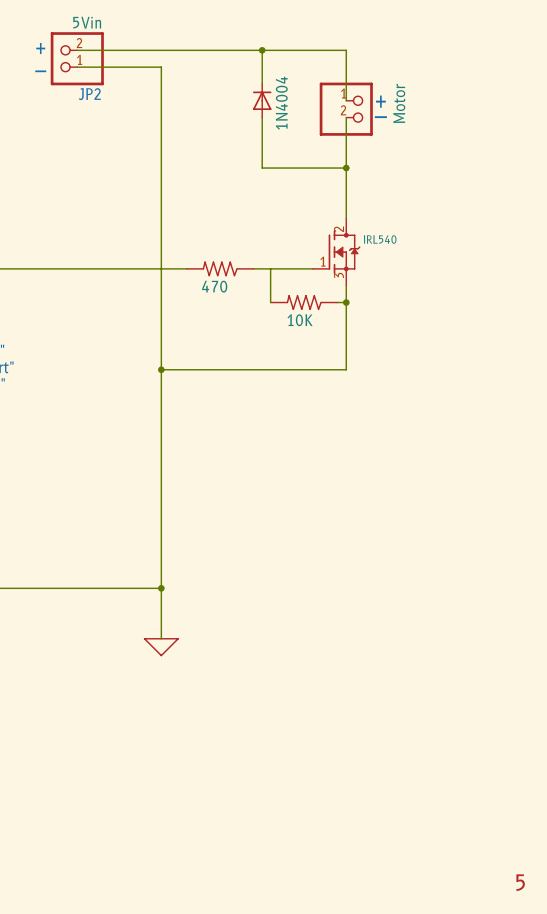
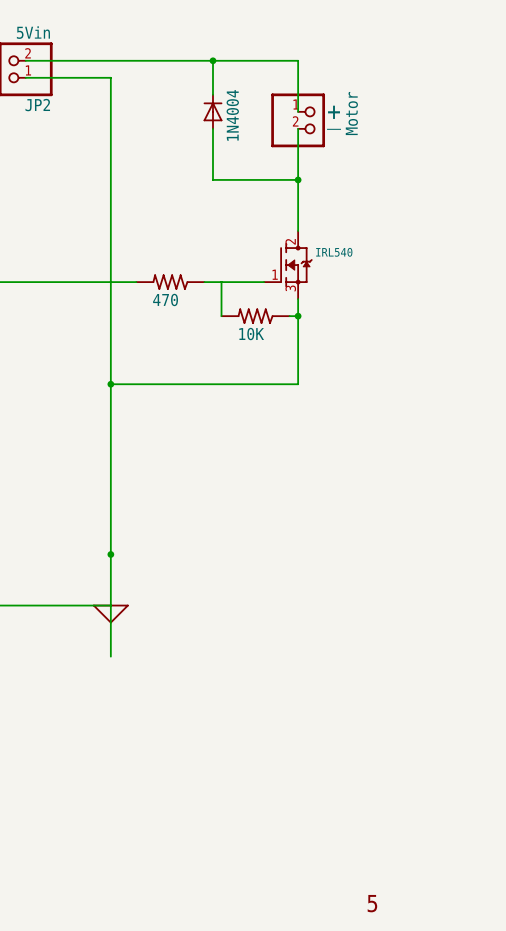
junction: none -> (110, 554)
junction: (161, 588) -> none
power symbol position: (161, 647) -> (110, 614)
text position: 5 (520, 882) -> 5 (372, 903)

